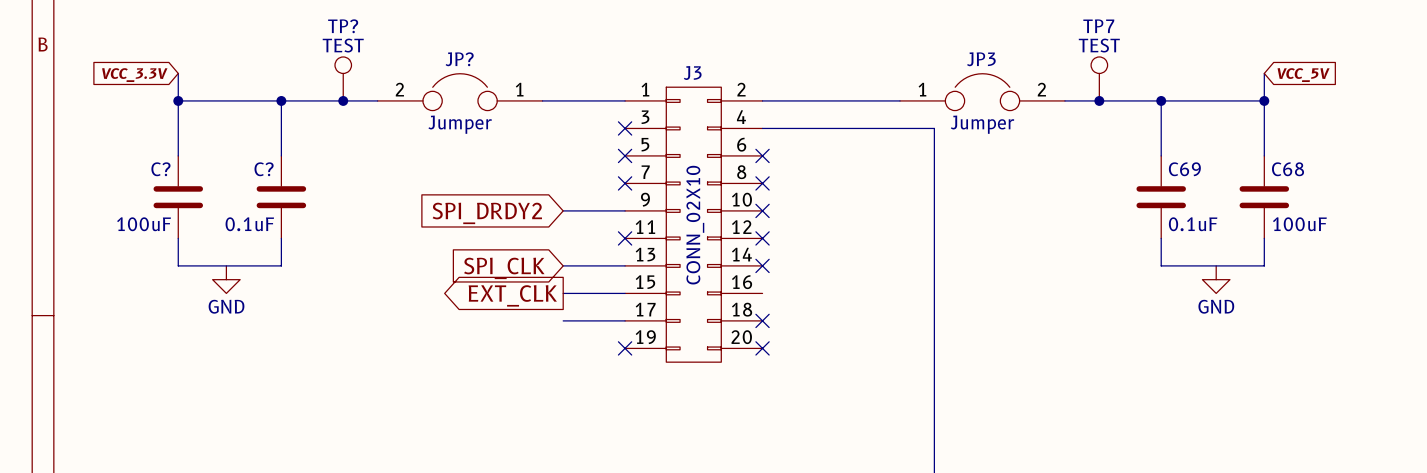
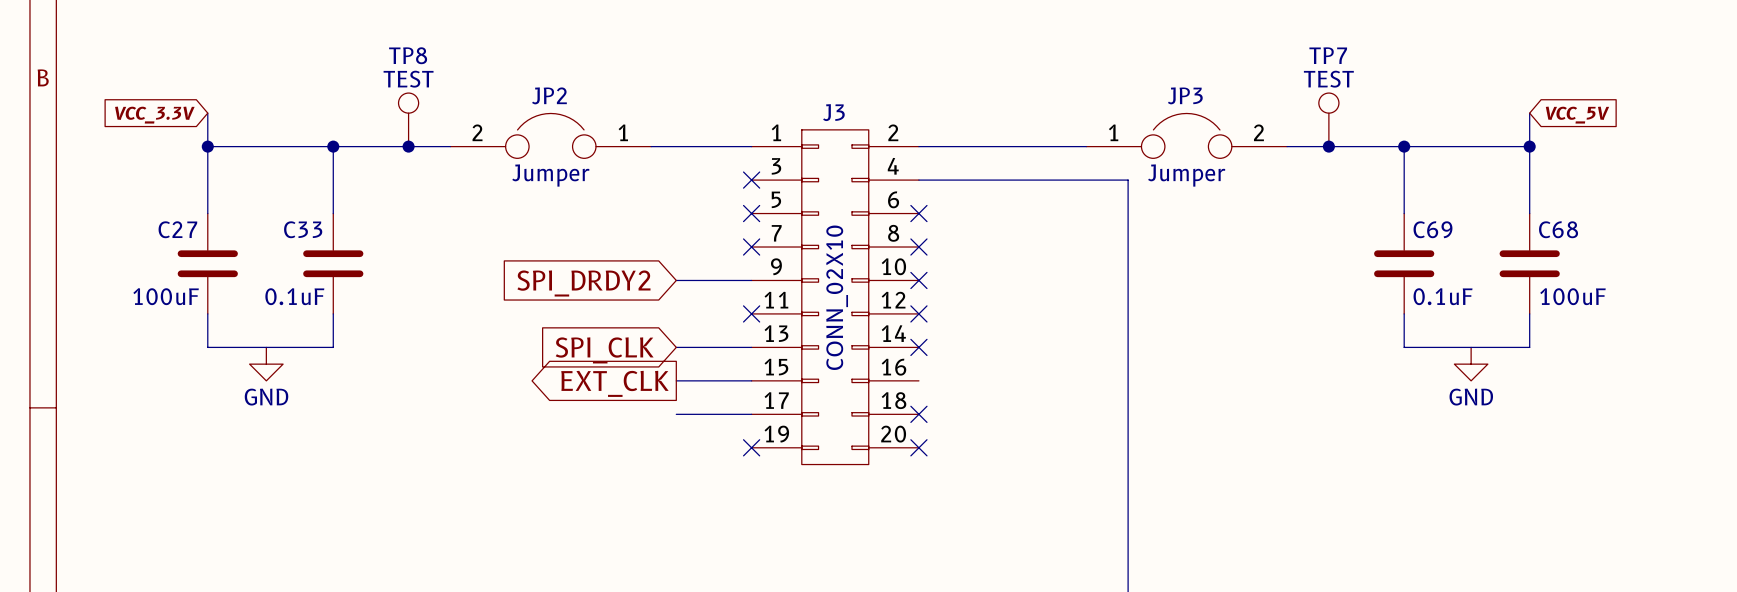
TP? name: TP? (343, 26) -> TP8 (408, 55)
JP? name: JP? (459, 59) -> JP2 (549, 95)
C? name: C? (160, 169) -> C27 (177, 229)
C? name: C? (264, 169) -> C33 (303, 229)

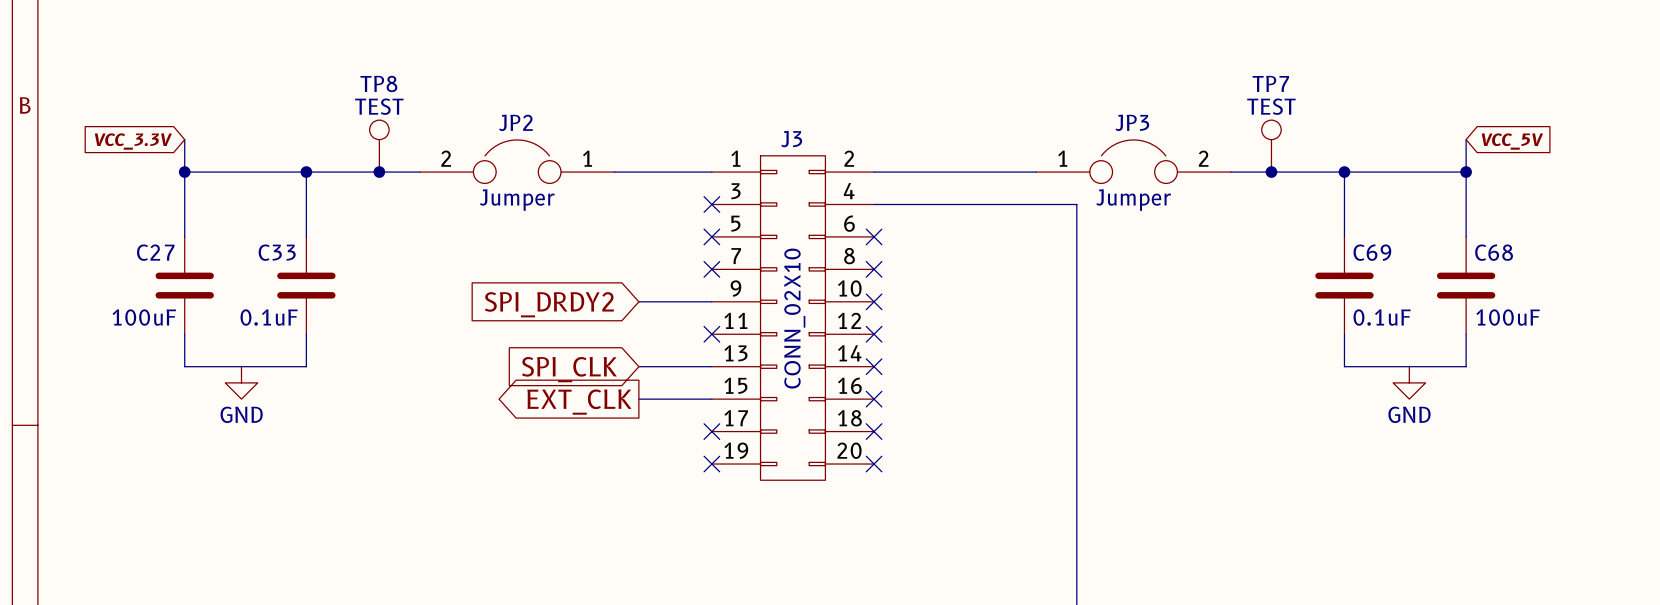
no-connect mark: none -> (874, 399)
wire: (676, 414) (751, 414) -> none
no-connect mark: none -> (711, 431)

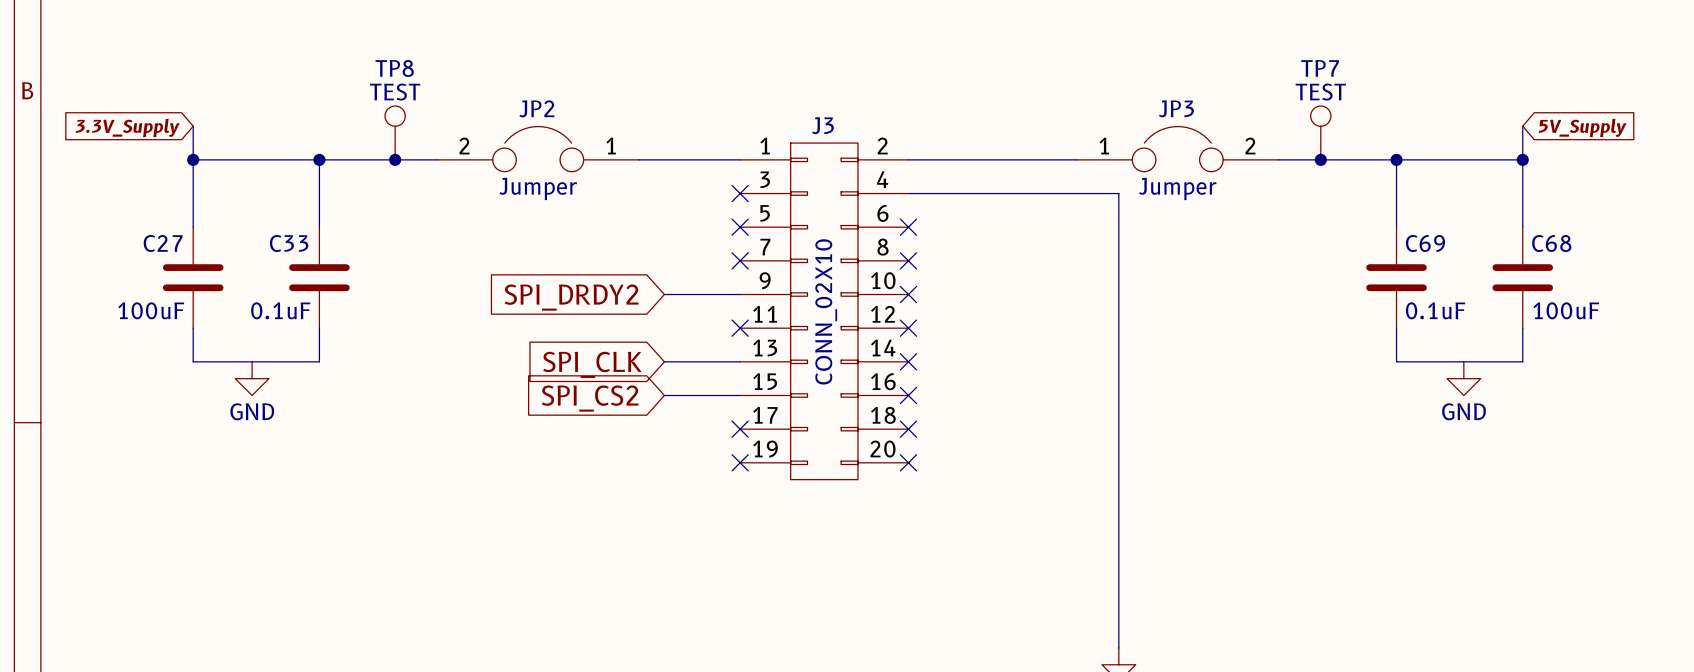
global label: VCC_3.3V (133, 141) -> 3.3V_Supply (127, 127)
global label: VCC_5V (1512, 141) -> 5V_Supply (1582, 127)
global label shape: output (579, 402) -> input (590, 398)
global label: EXT_CLK (579, 402) -> SPI_CS2 (590, 398)

